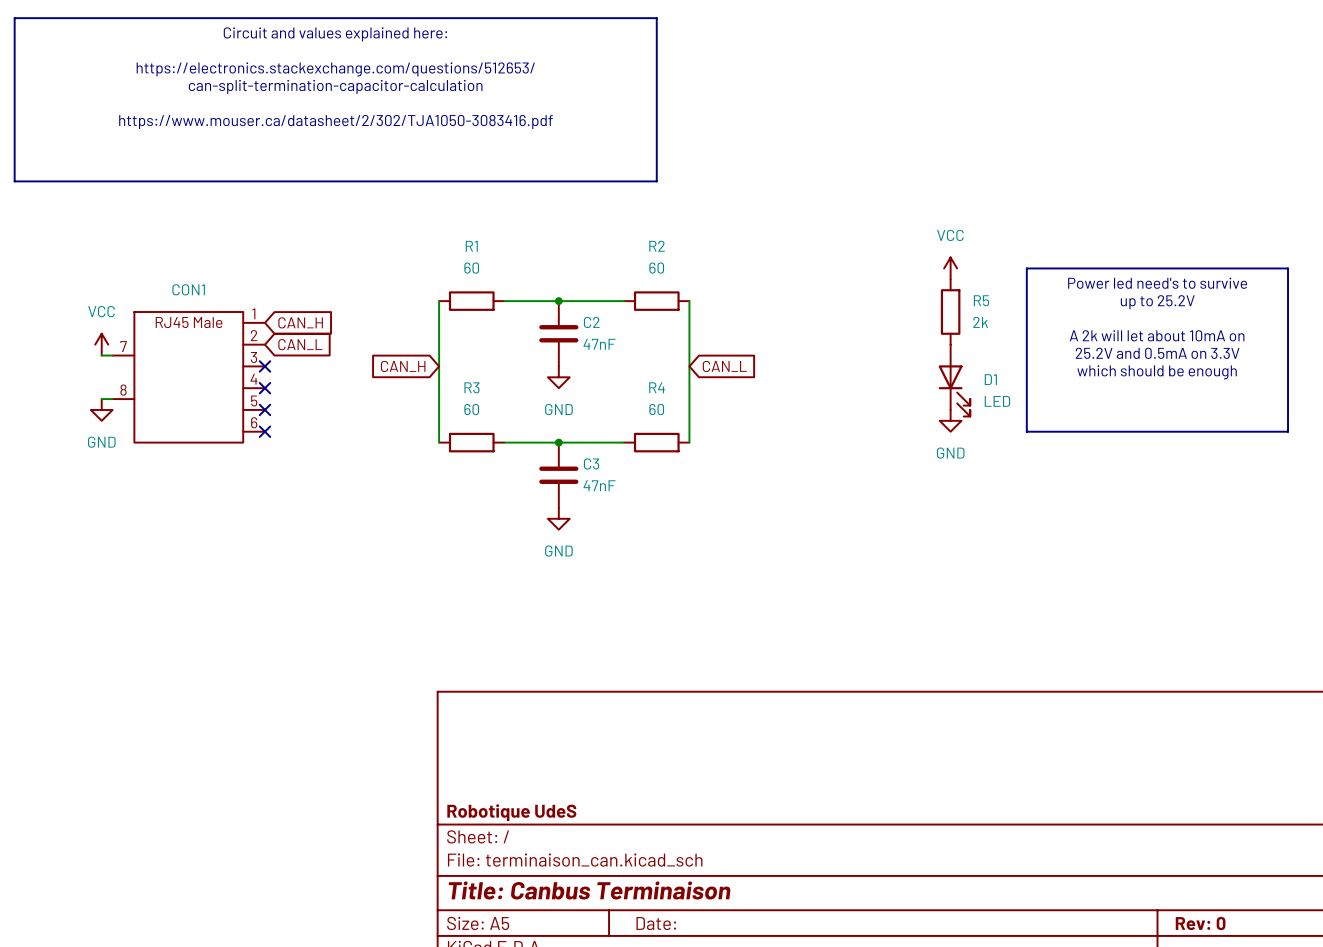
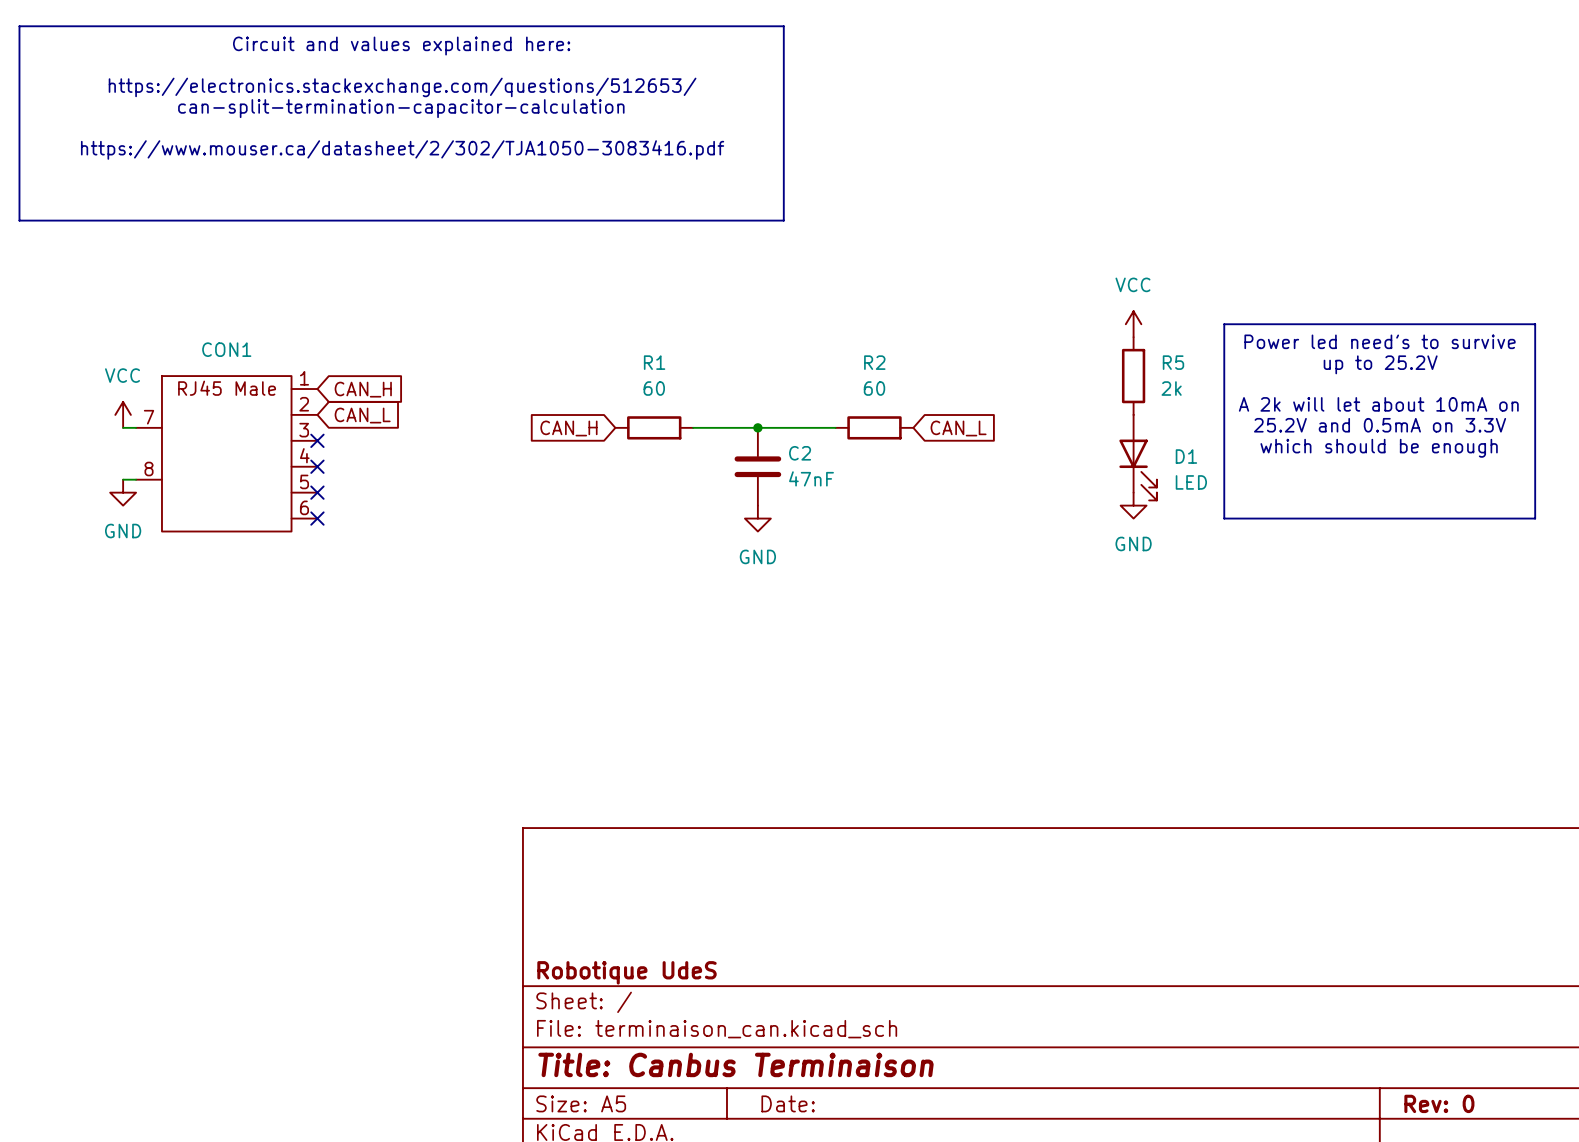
wire: (439, 301) (439, 442) -> none
R1 position: (471, 301) -> (654, 427)
wire: (504, 301) (624, 301) -> (693, 427) (835, 427)
junction: (558, 301) -> none
R2 position: (656, 301) -> (874, 427)
wire: (689, 301) (689, 442) -> none
C2 position: (558, 333) -> (757, 466)
junction: none -> (757, 427)
global label position: CAN_H (403, 366) -> CAN_H (568, 428)
global label position: CAN_L (724, 366) -> CAN_L (958, 428)
power symbol: GND (558, 377) -> none
power symbol: none -> GND (757, 518)
R3: 60 (471, 442) -> none
wire: (504, 442) (624, 442) -> none
junction: (558, 442) -> none
R4: 60 (656, 442) -> none
C3: 47nF (558, 475) -> none
power symbol: GND (558, 518) -> none

